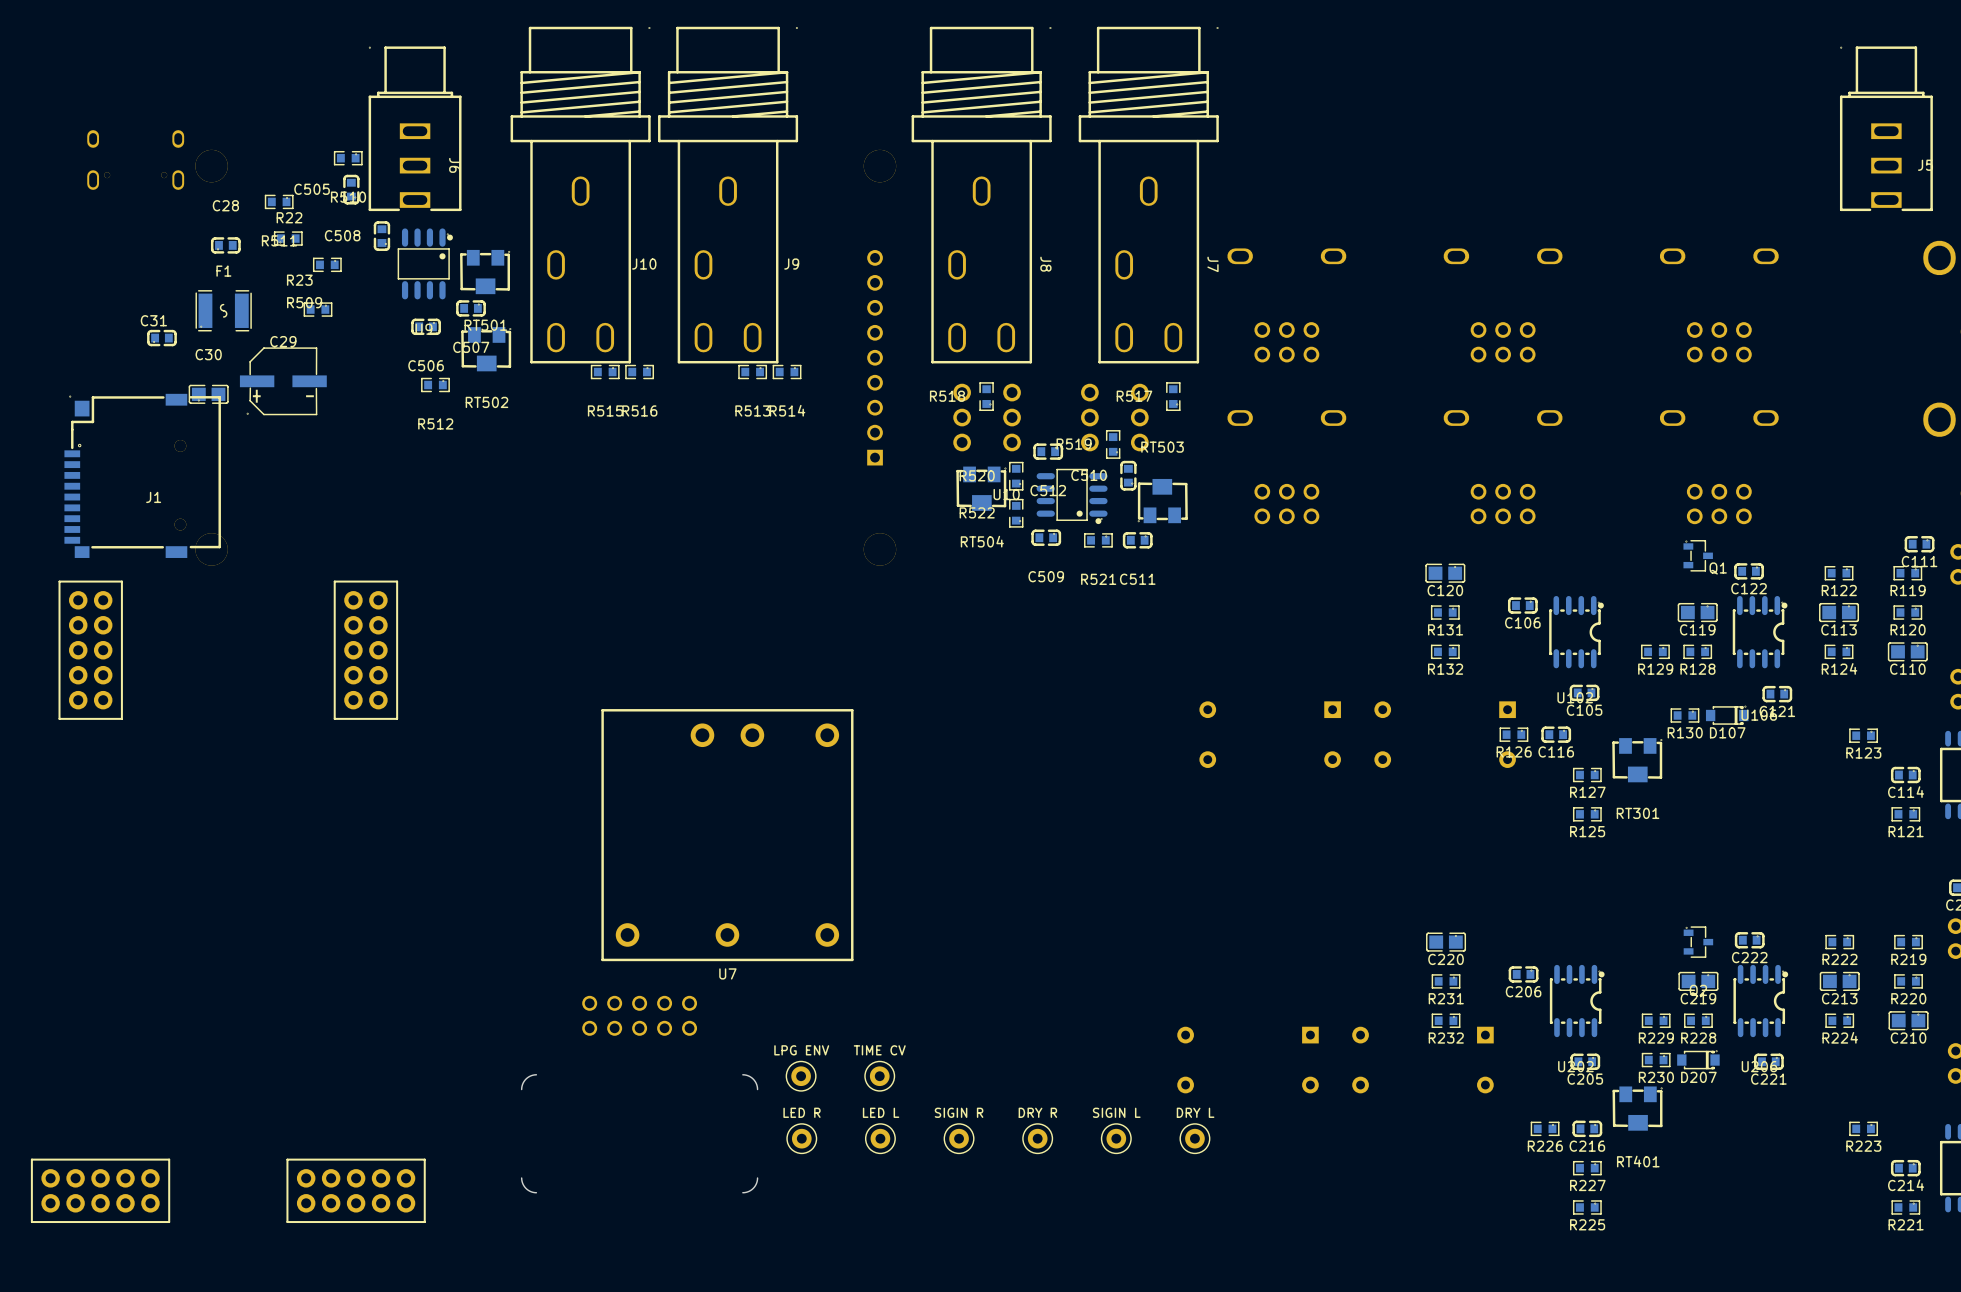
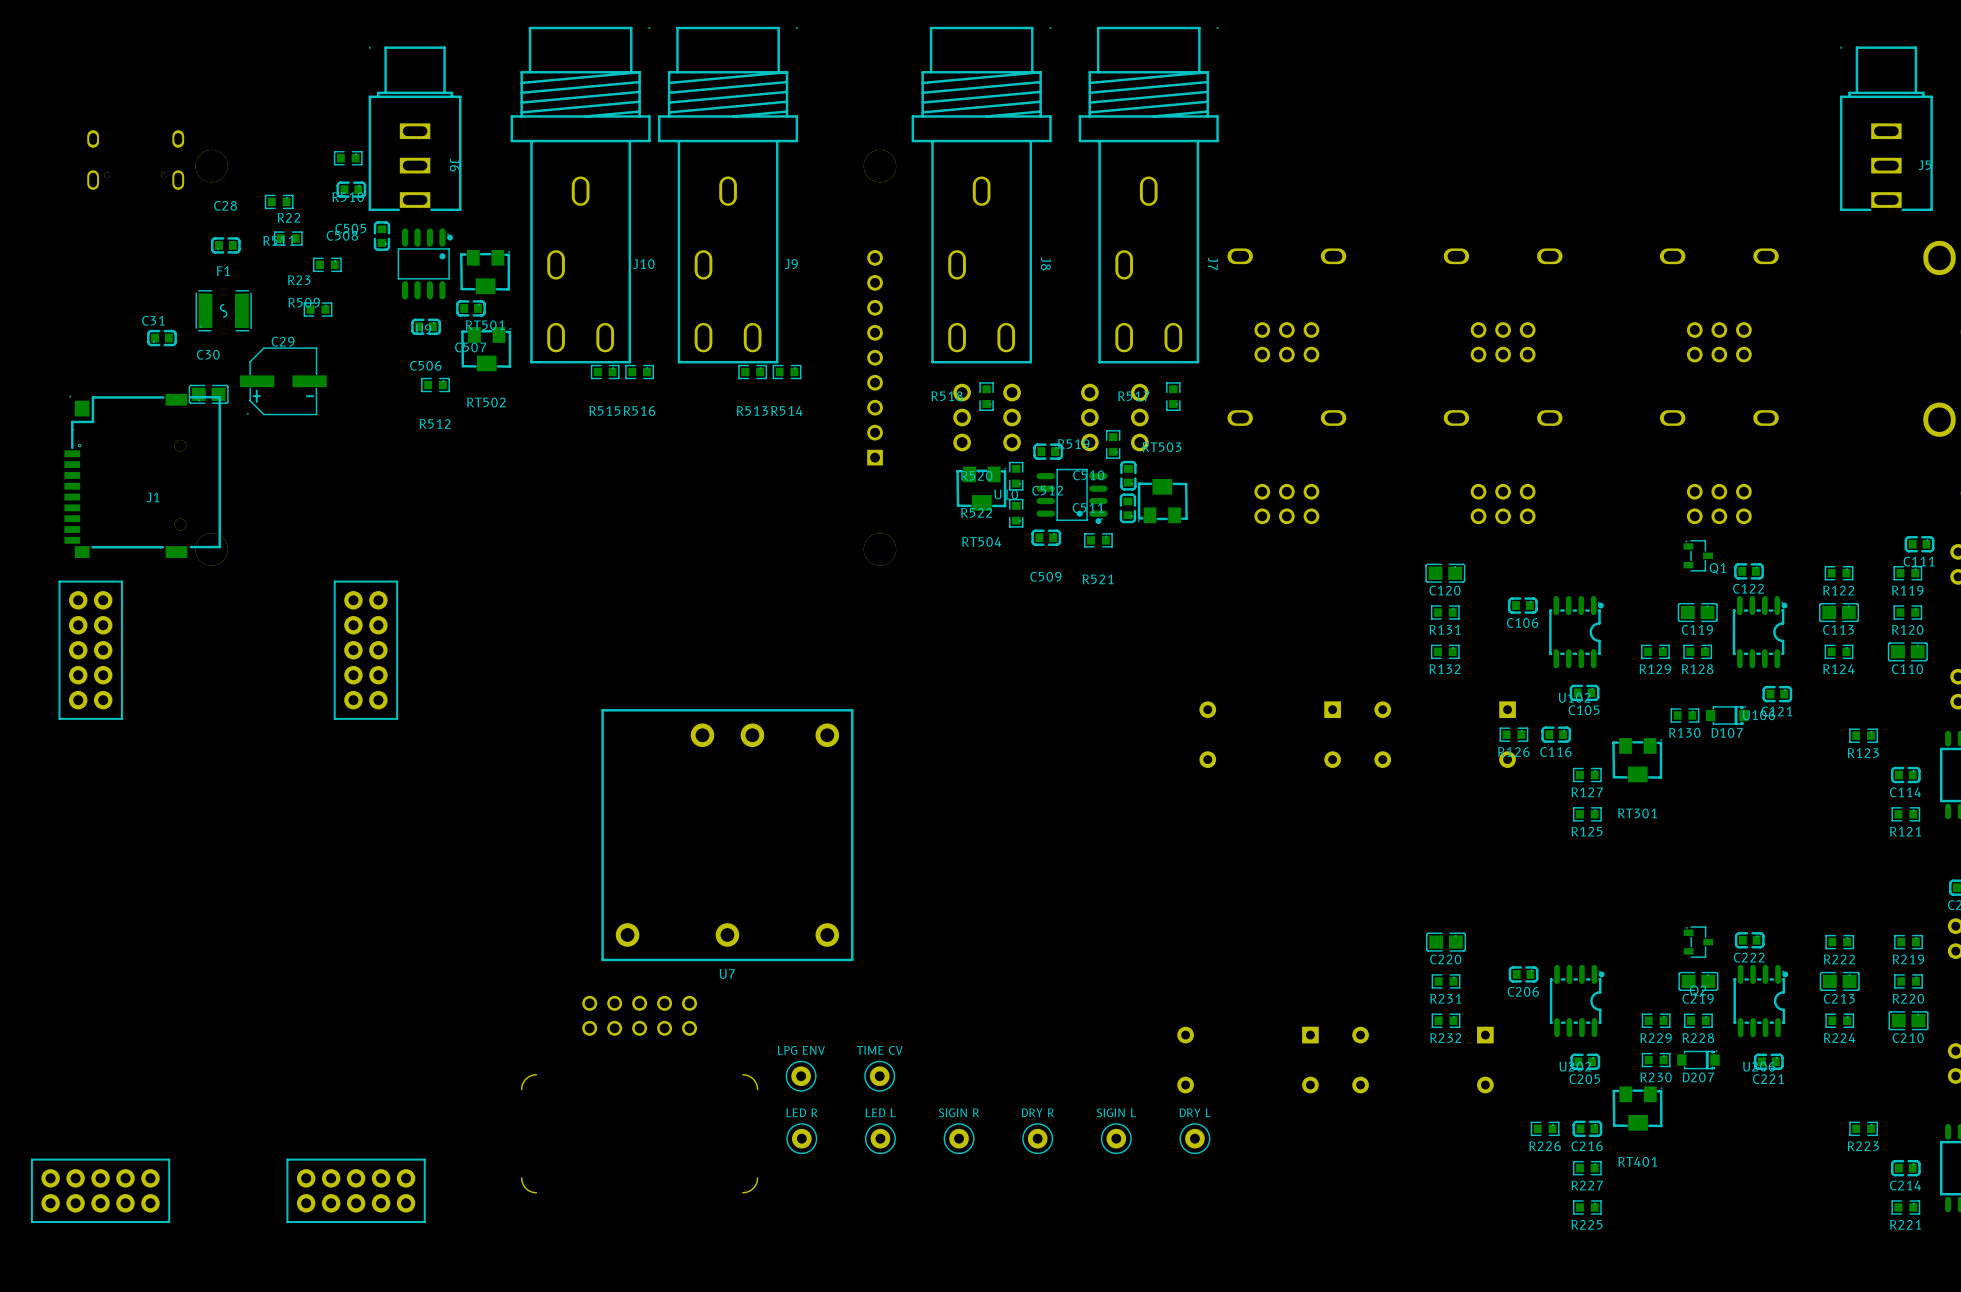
C505 rotation: 0° (351, 189) -> 90° counterclockwise (351, 189)
C511 rotation: 0° (1137, 540) -> 90° clockwise (1127, 508)
C511 position: (1137, 540) -> (1127, 508)

